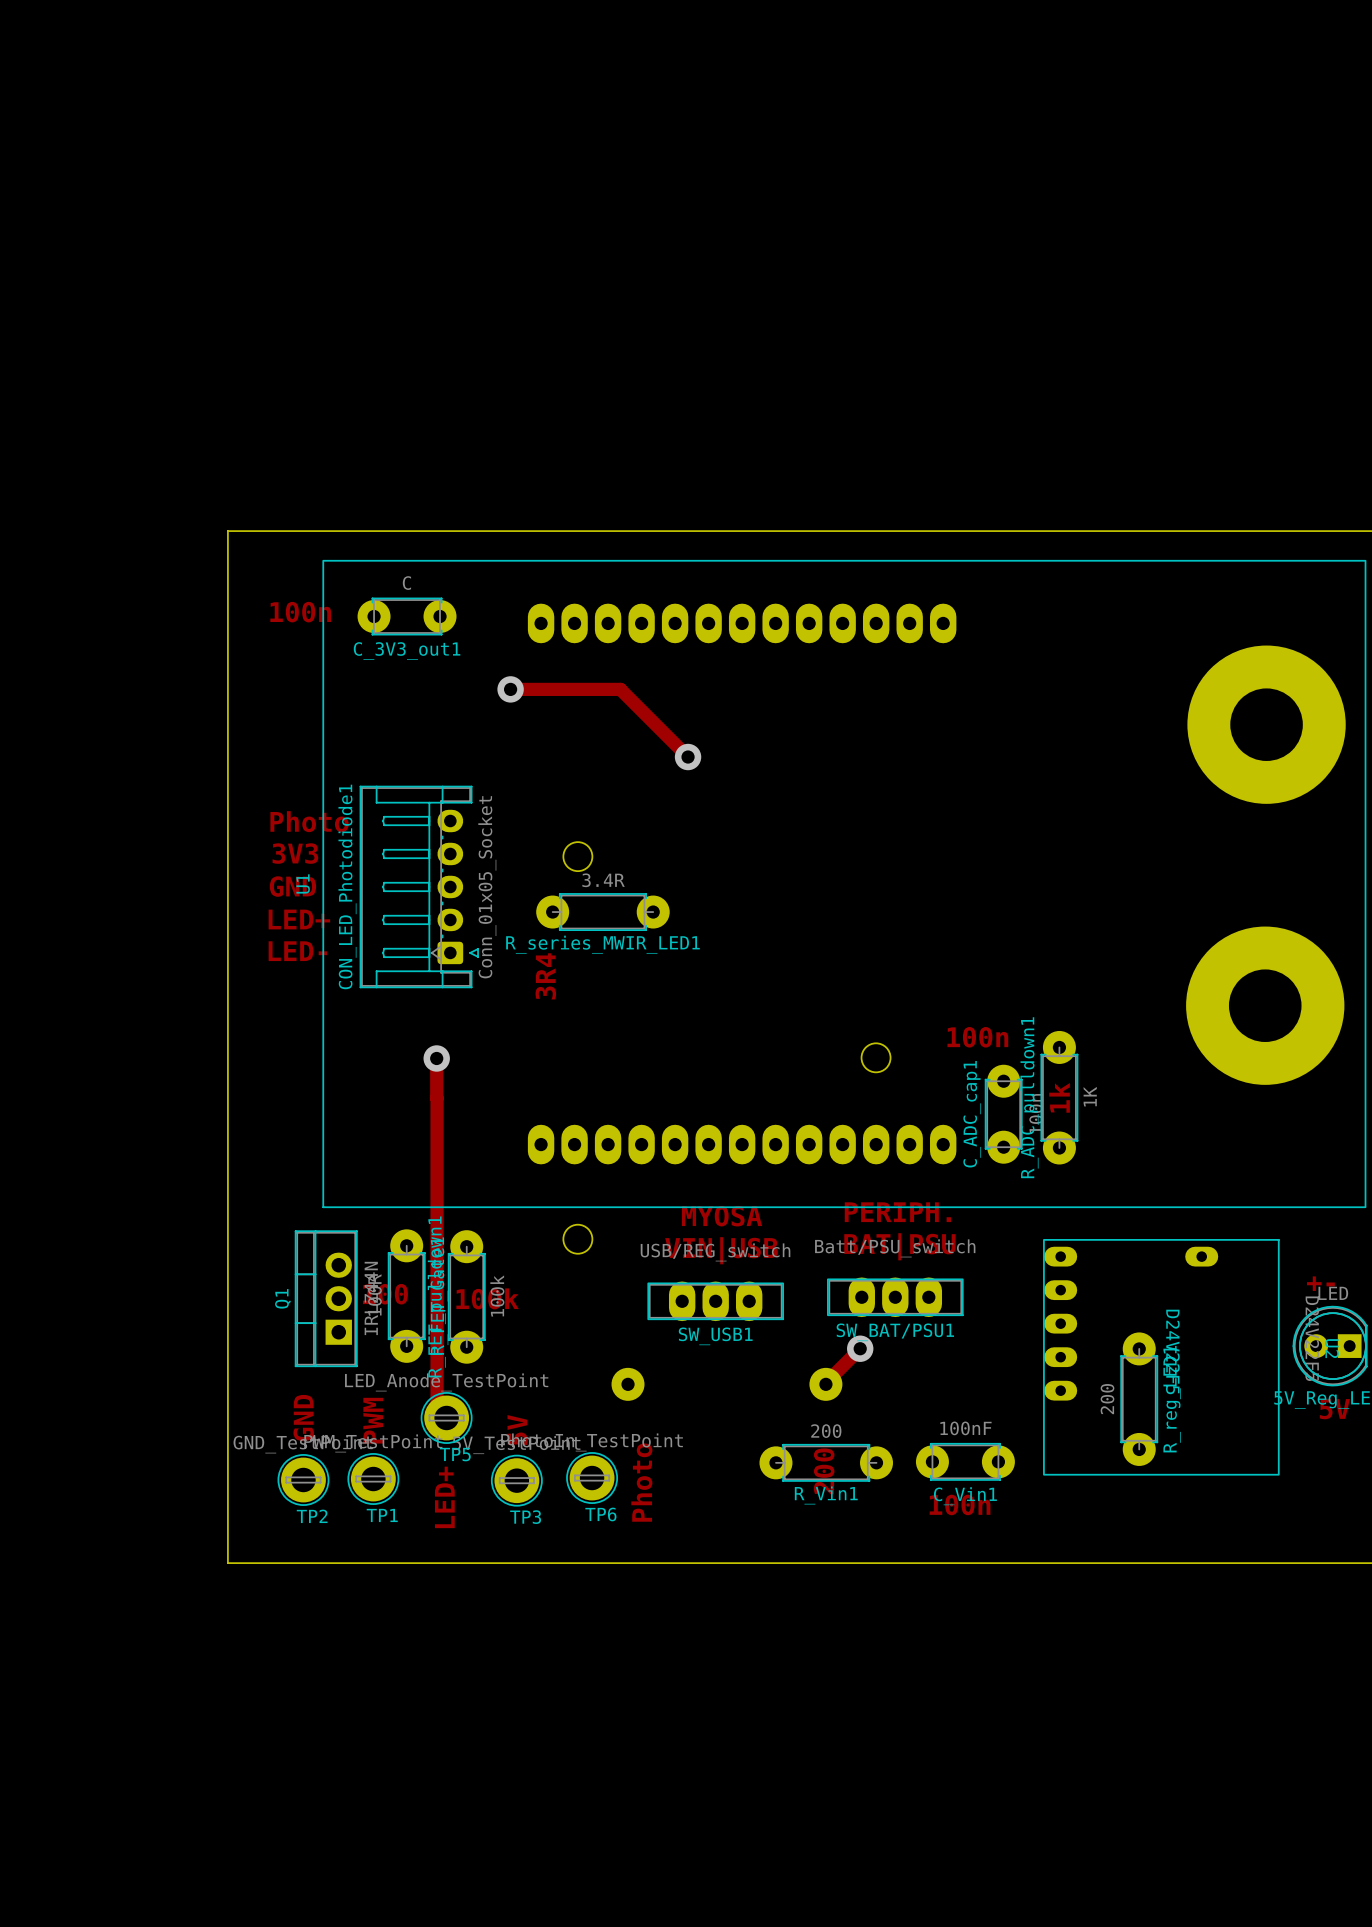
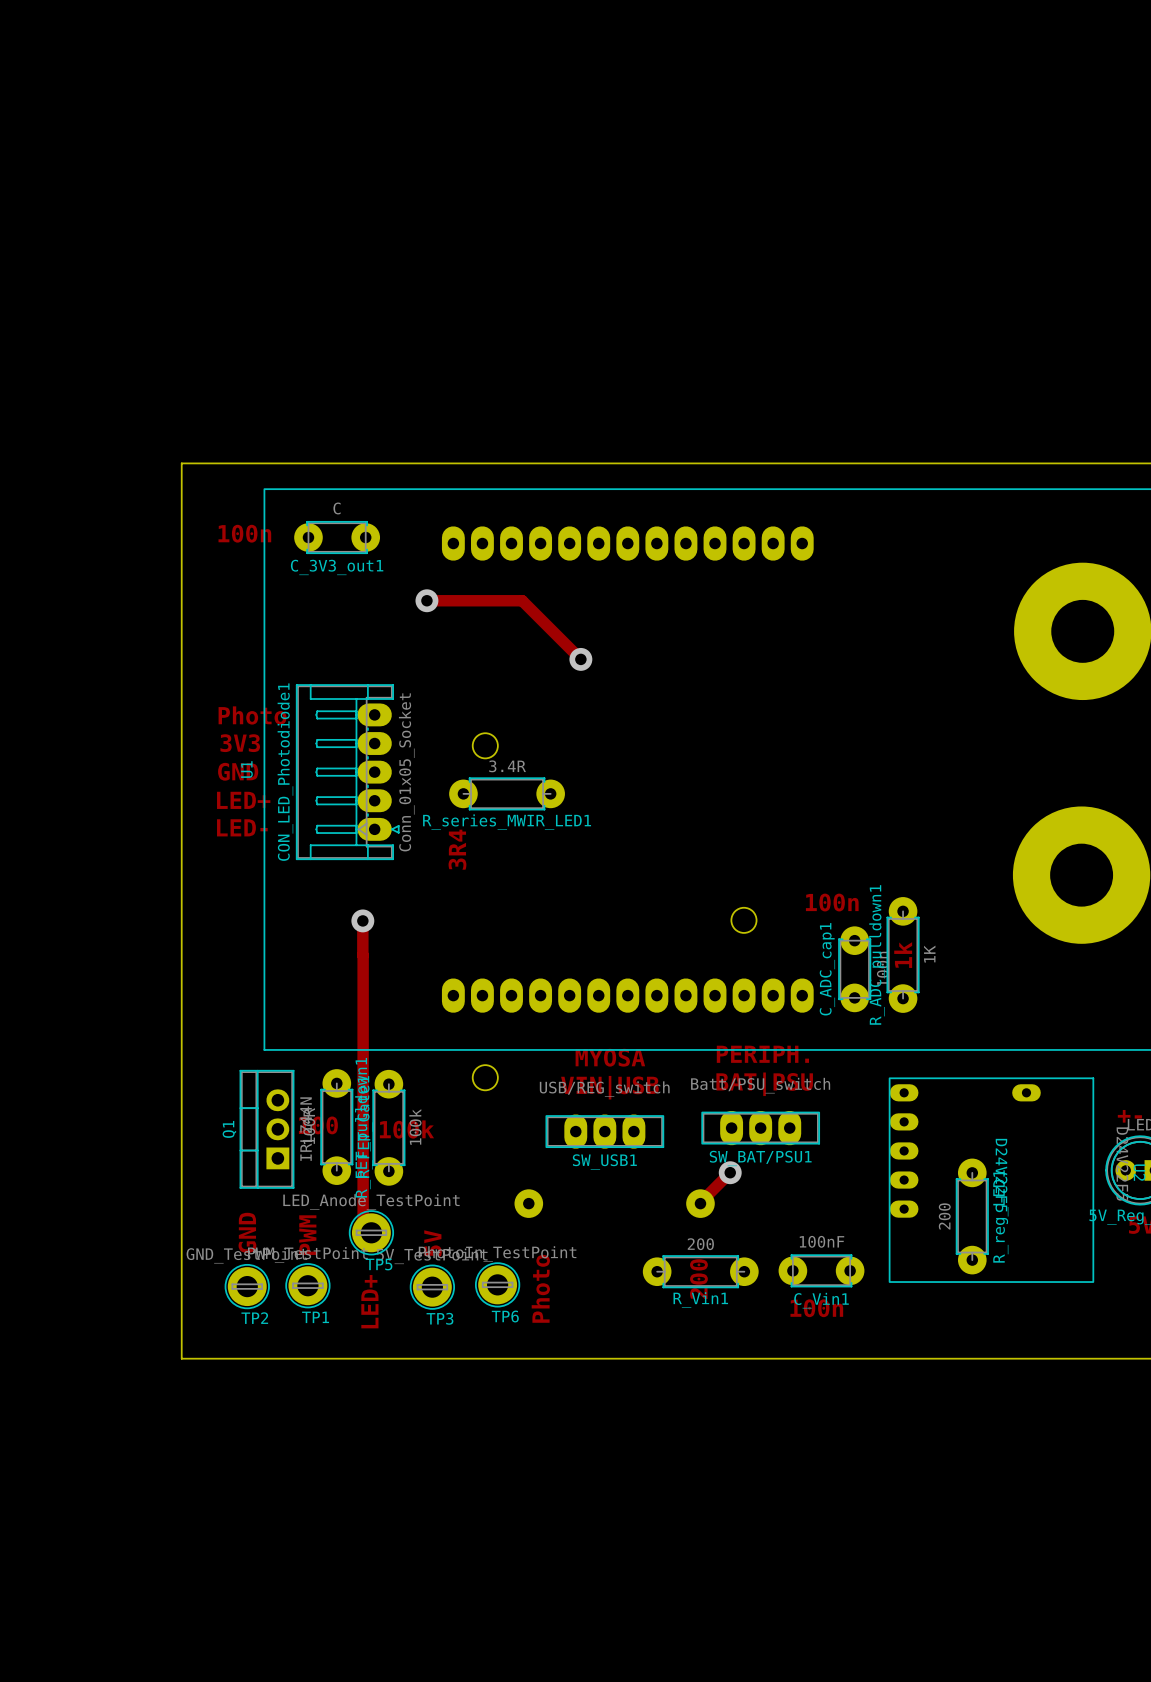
CON_LED_Photodiode1 footprint: [359, 785, 479, 989] -> [296, 684, 400, 860]

